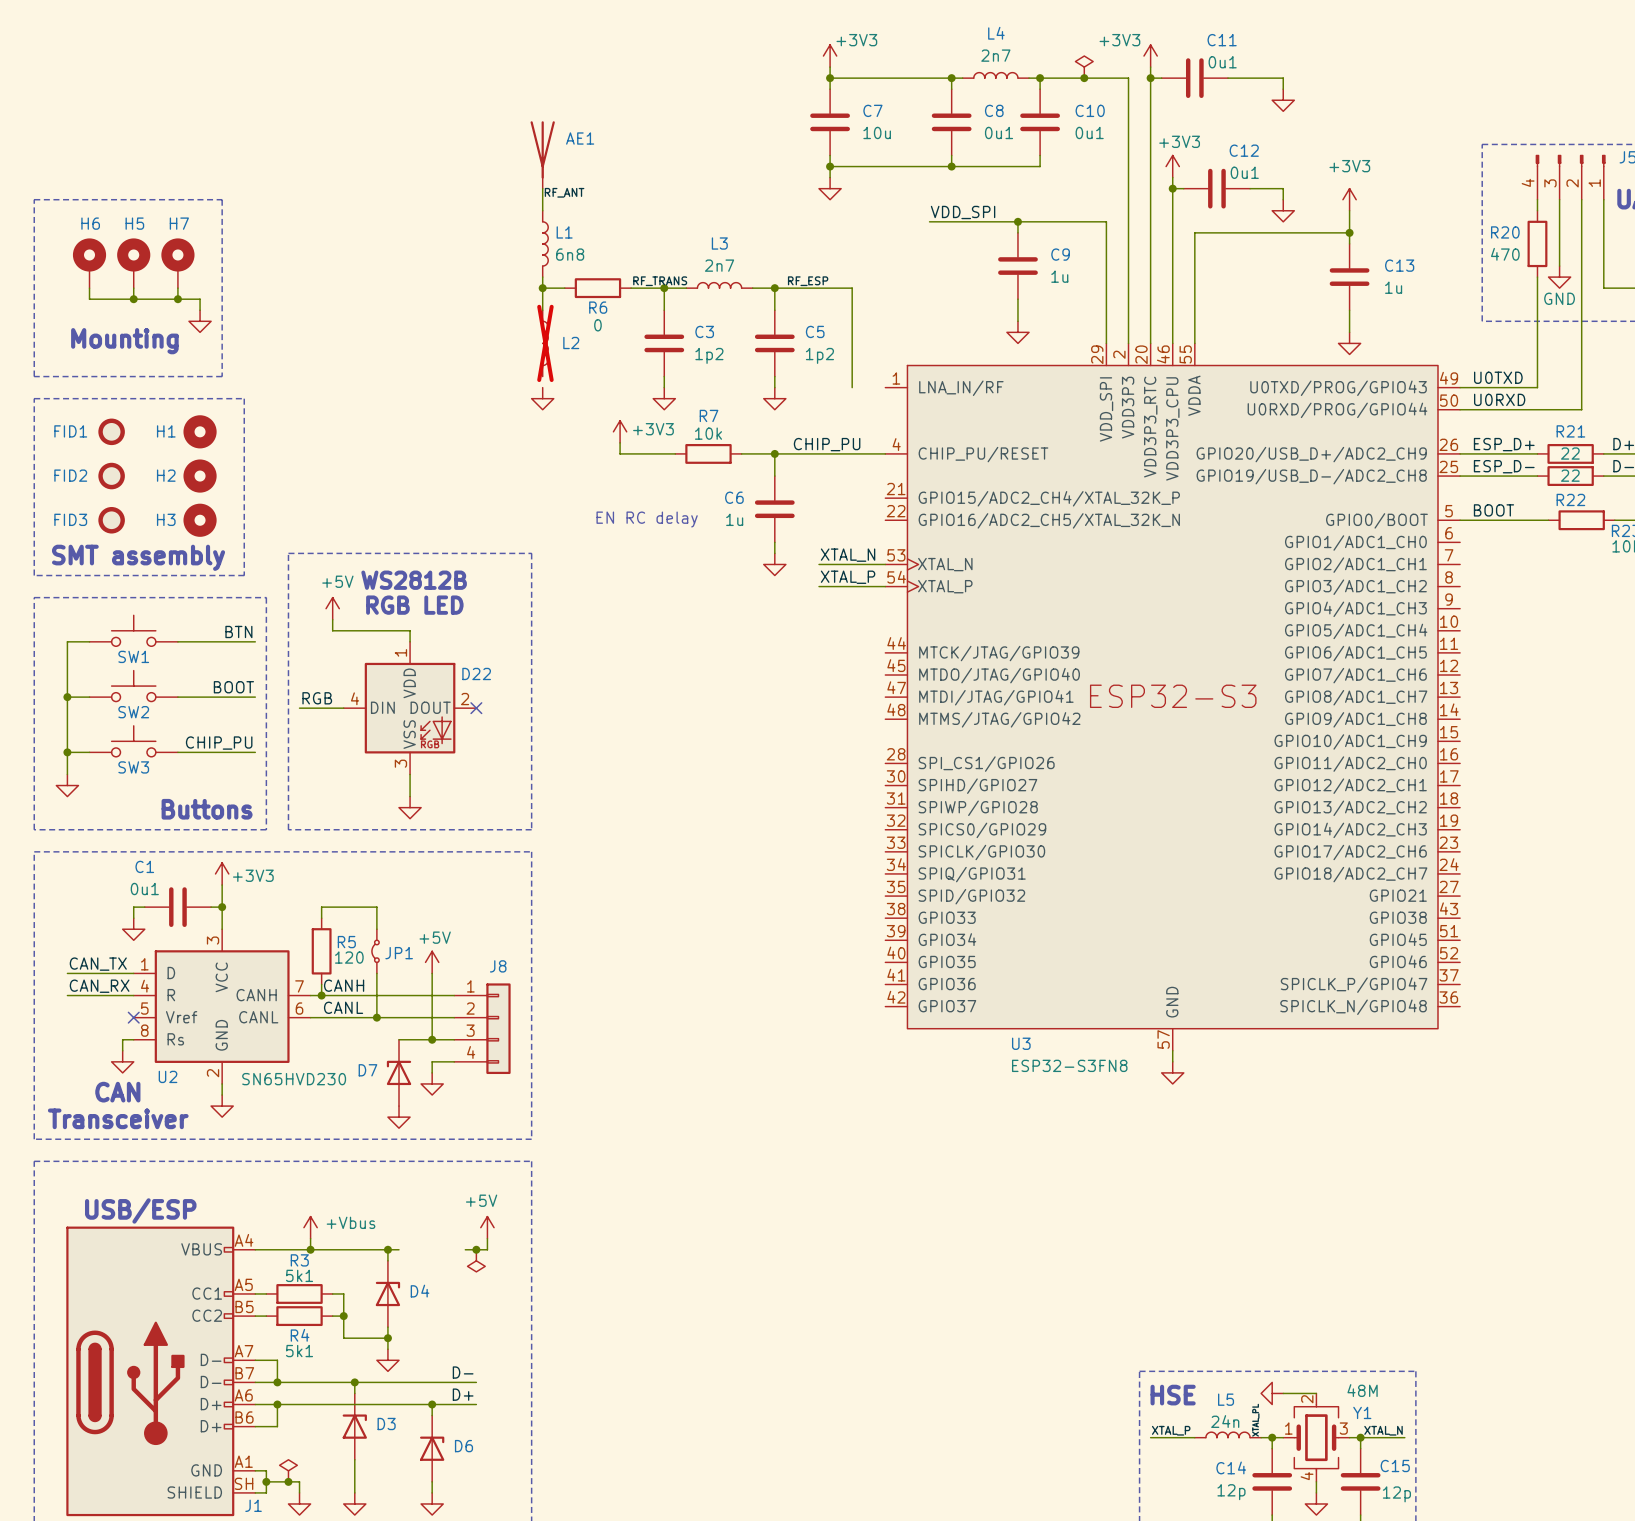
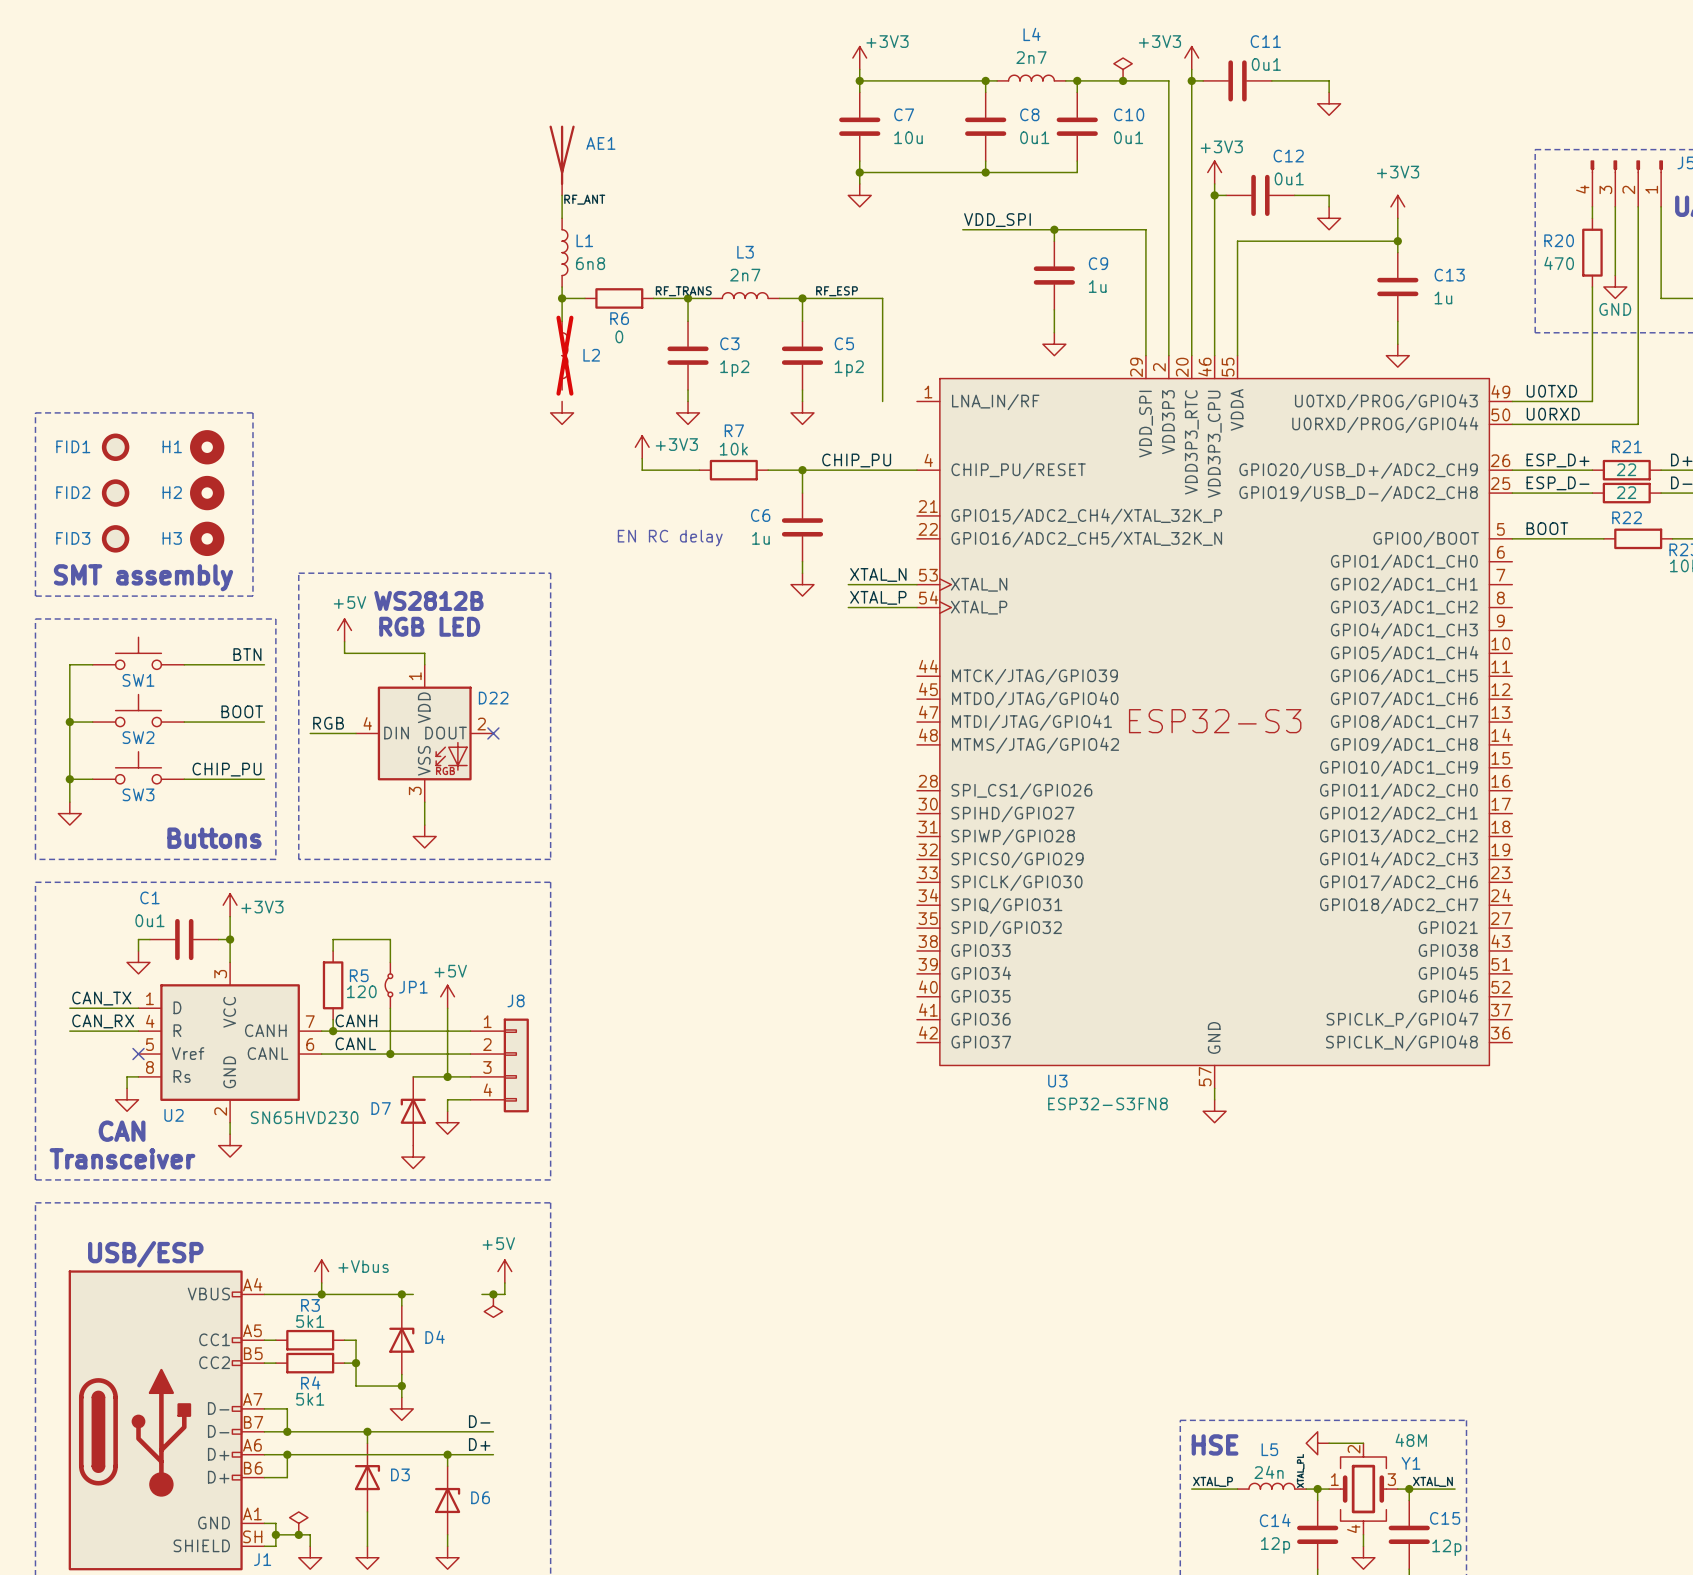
line: (34, 199) (222, 199) (222, 376) (34, 376) (34, 199) -> none
H6: (89, 263) -> none
H5: (133, 263) -> none
H7: (177, 263) -> none
wire: (89, 288) (89, 299) (200, 299) (200, 310) -> none
wire: (133, 288) (133, 299) -> none
wire: (177, 288) (177, 299) -> none
junction: (133, 299) -> none
junction: (177, 299) -> none
power symbol: (200, 321) -> none
text: Mounting (124, 341) -> none

